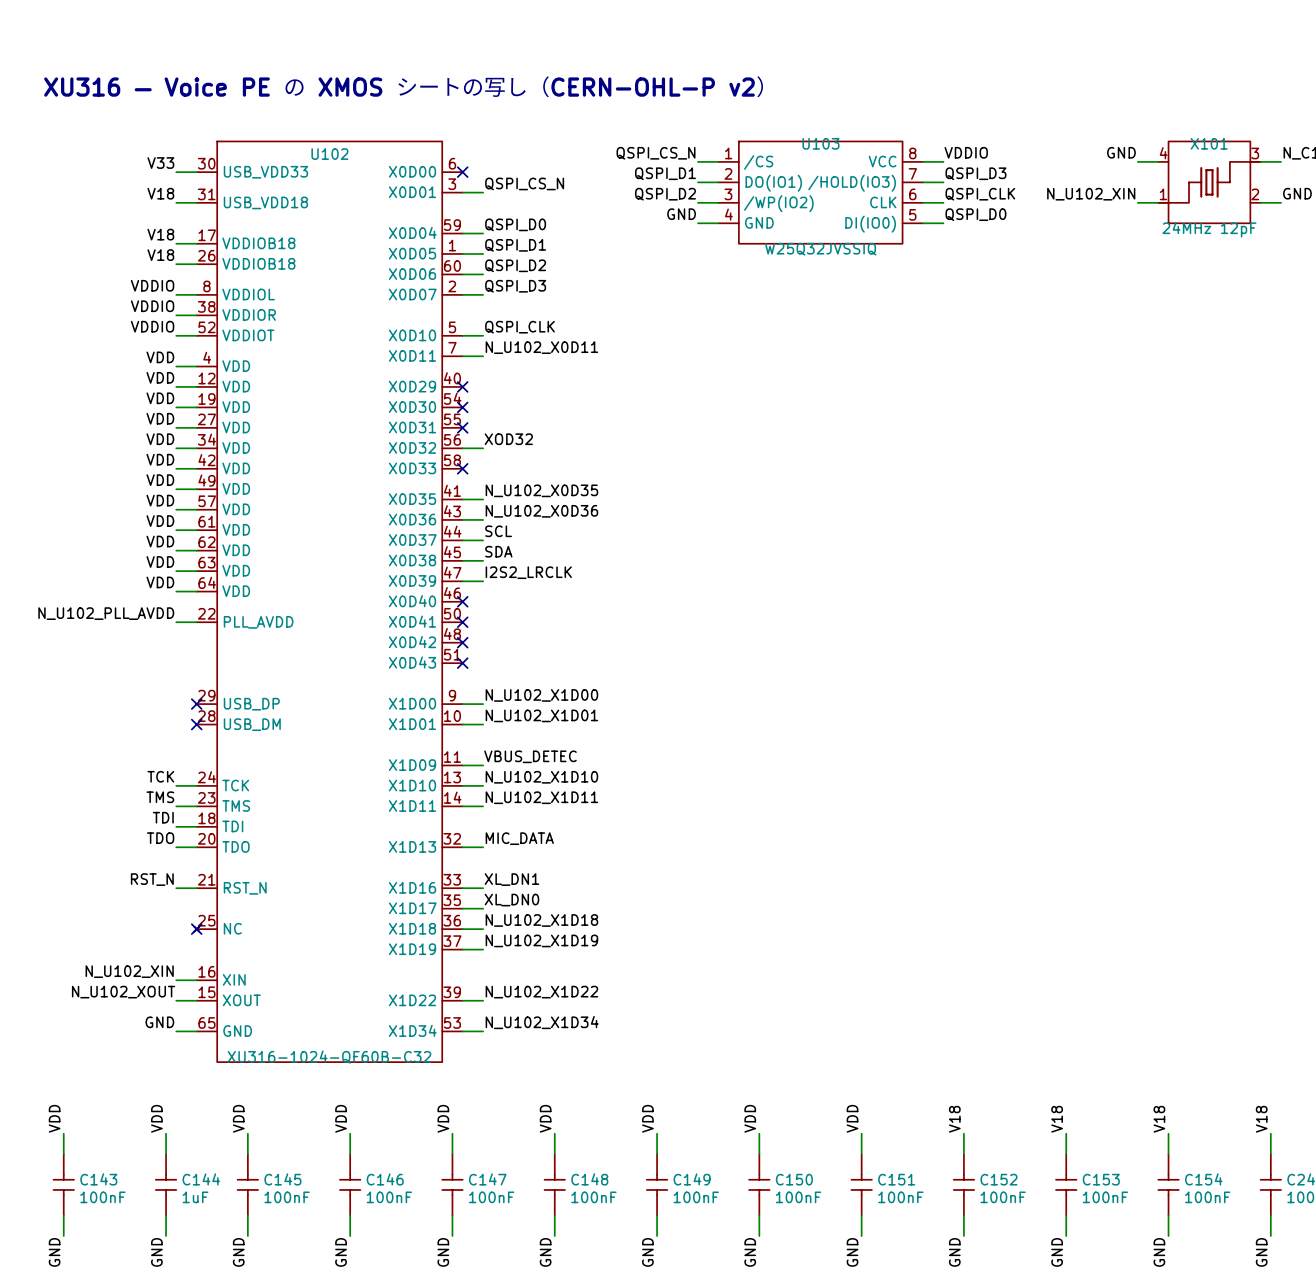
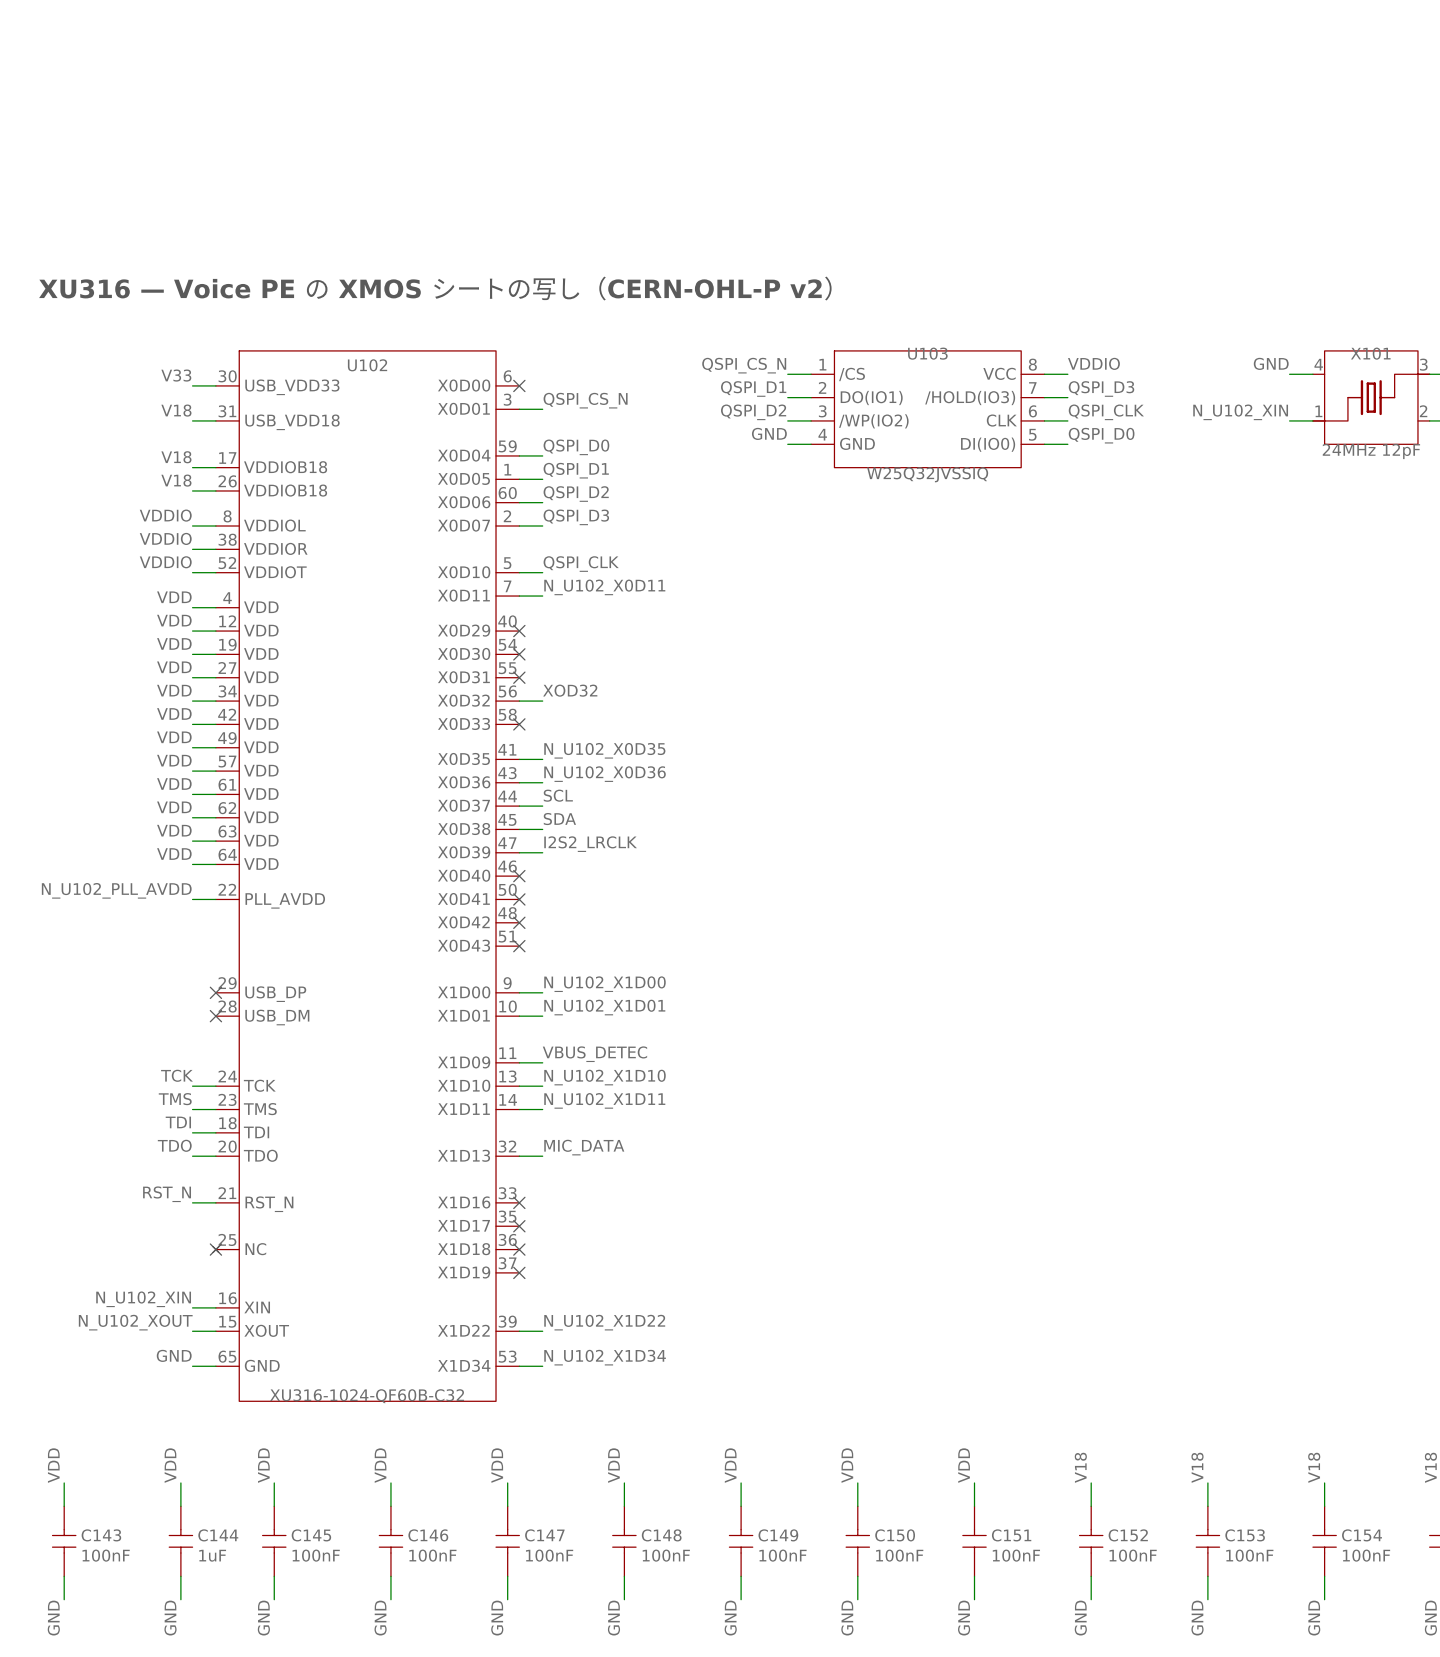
label: XL_DN1 (511, 879) -> none
wire: (462, 888) (483, 888) -> none
no-connect mark: none -> (519, 1202)
label: XL_DN0 (511, 900) -> none
wire: (462, 908) (483, 908) -> none
no-connect mark: none -> (519, 1226)
label: N_U102_X1D18 (541, 920) -> none
wire: (462, 929) (483, 929) -> none
no-connect mark: none -> (519, 1249)
label: N_U102_X1D19 (541, 940) -> none
wire: (462, 949) (483, 949) -> none
no-connect mark: none -> (519, 1272)

